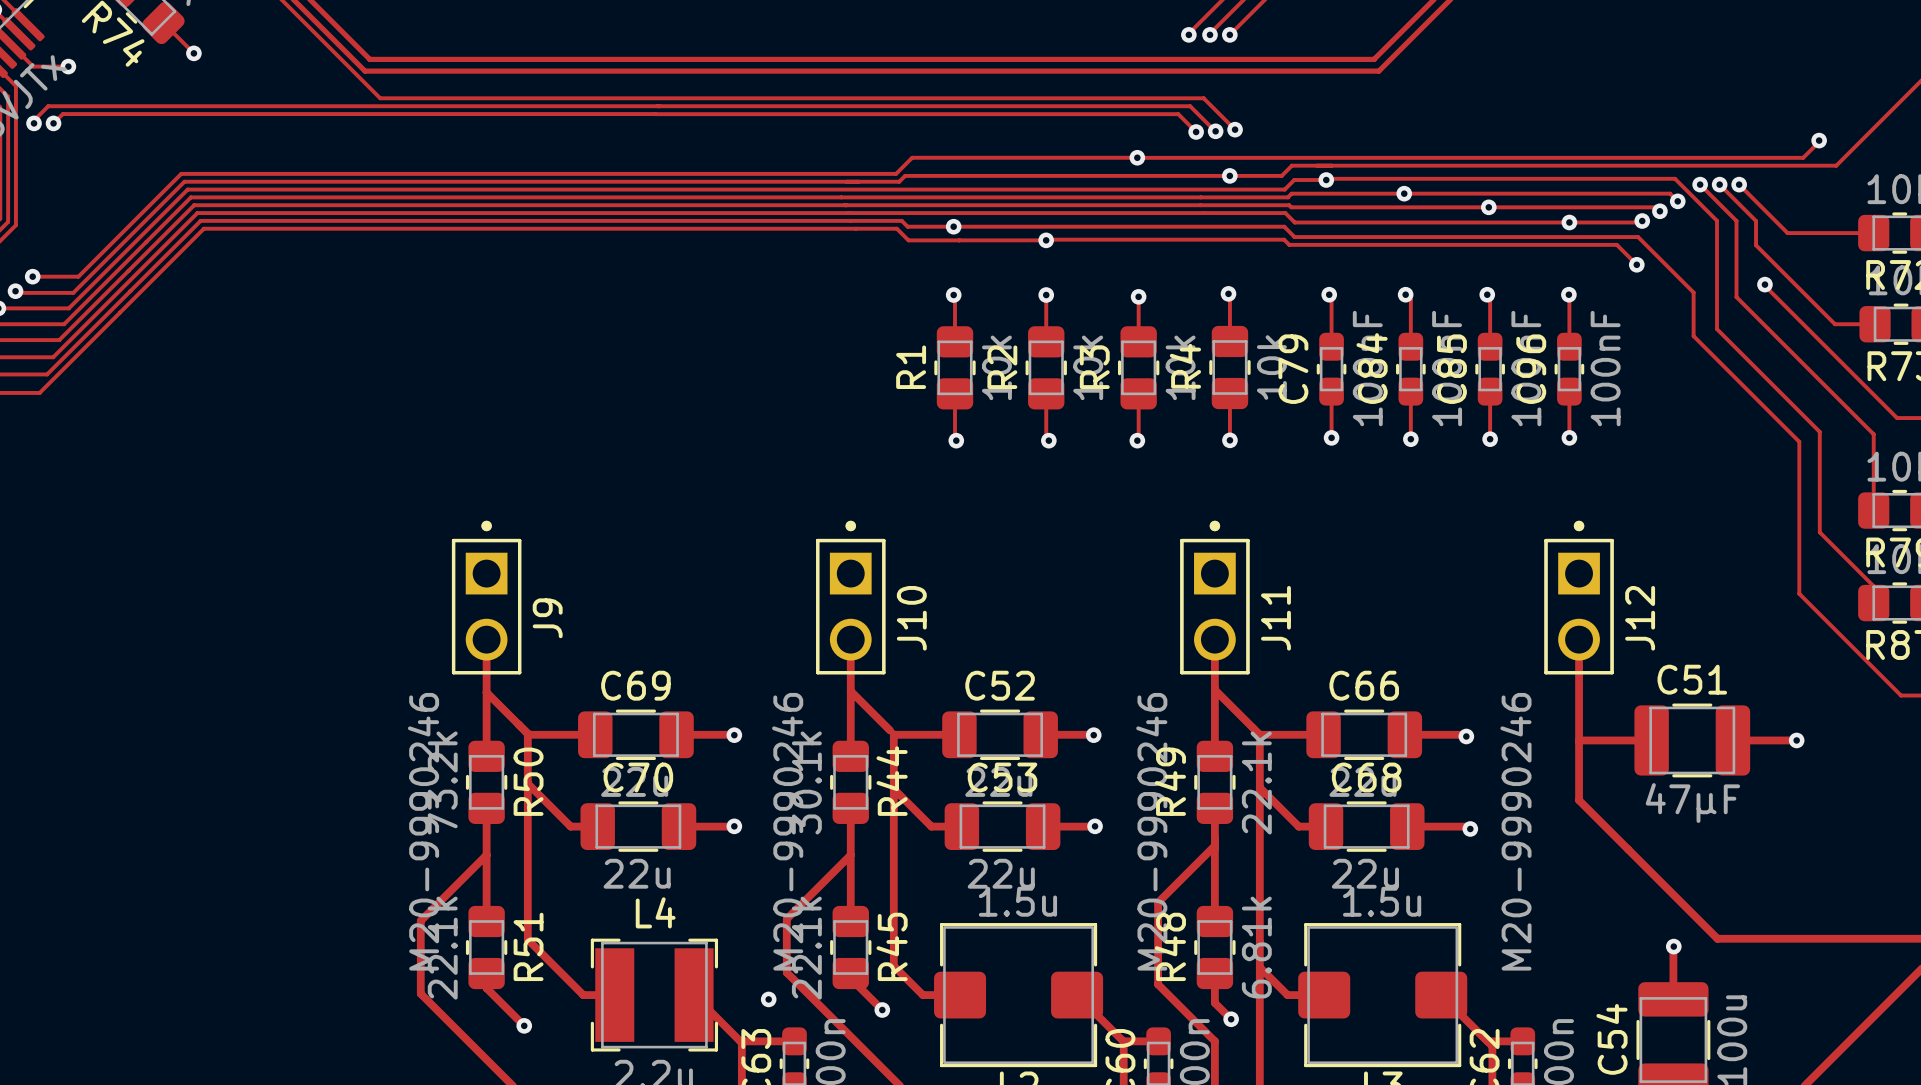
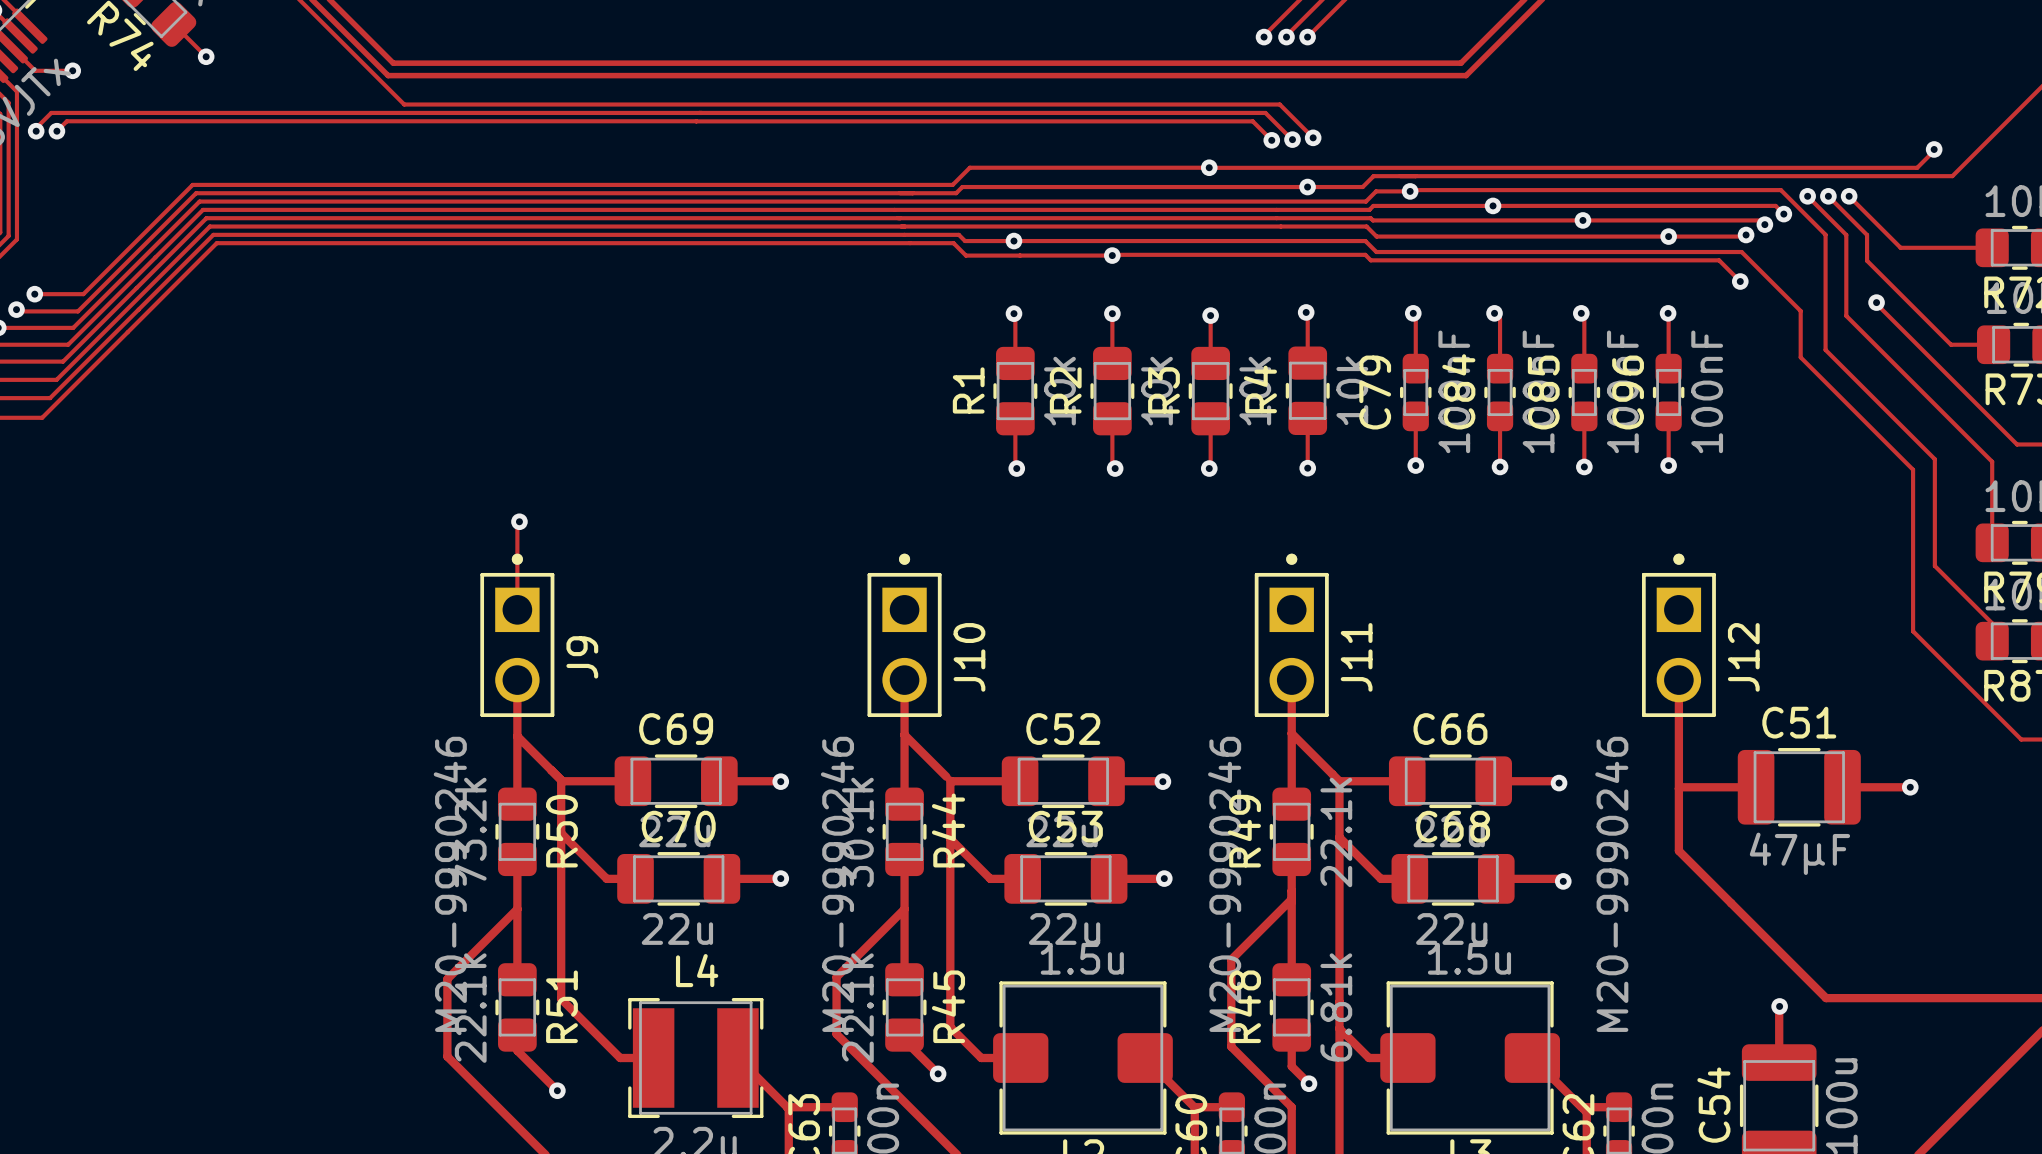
track: none -> (519, 521) (517, 523) (517, 609)
via: none -> (519, 521)
via: (768, 999) -> none

